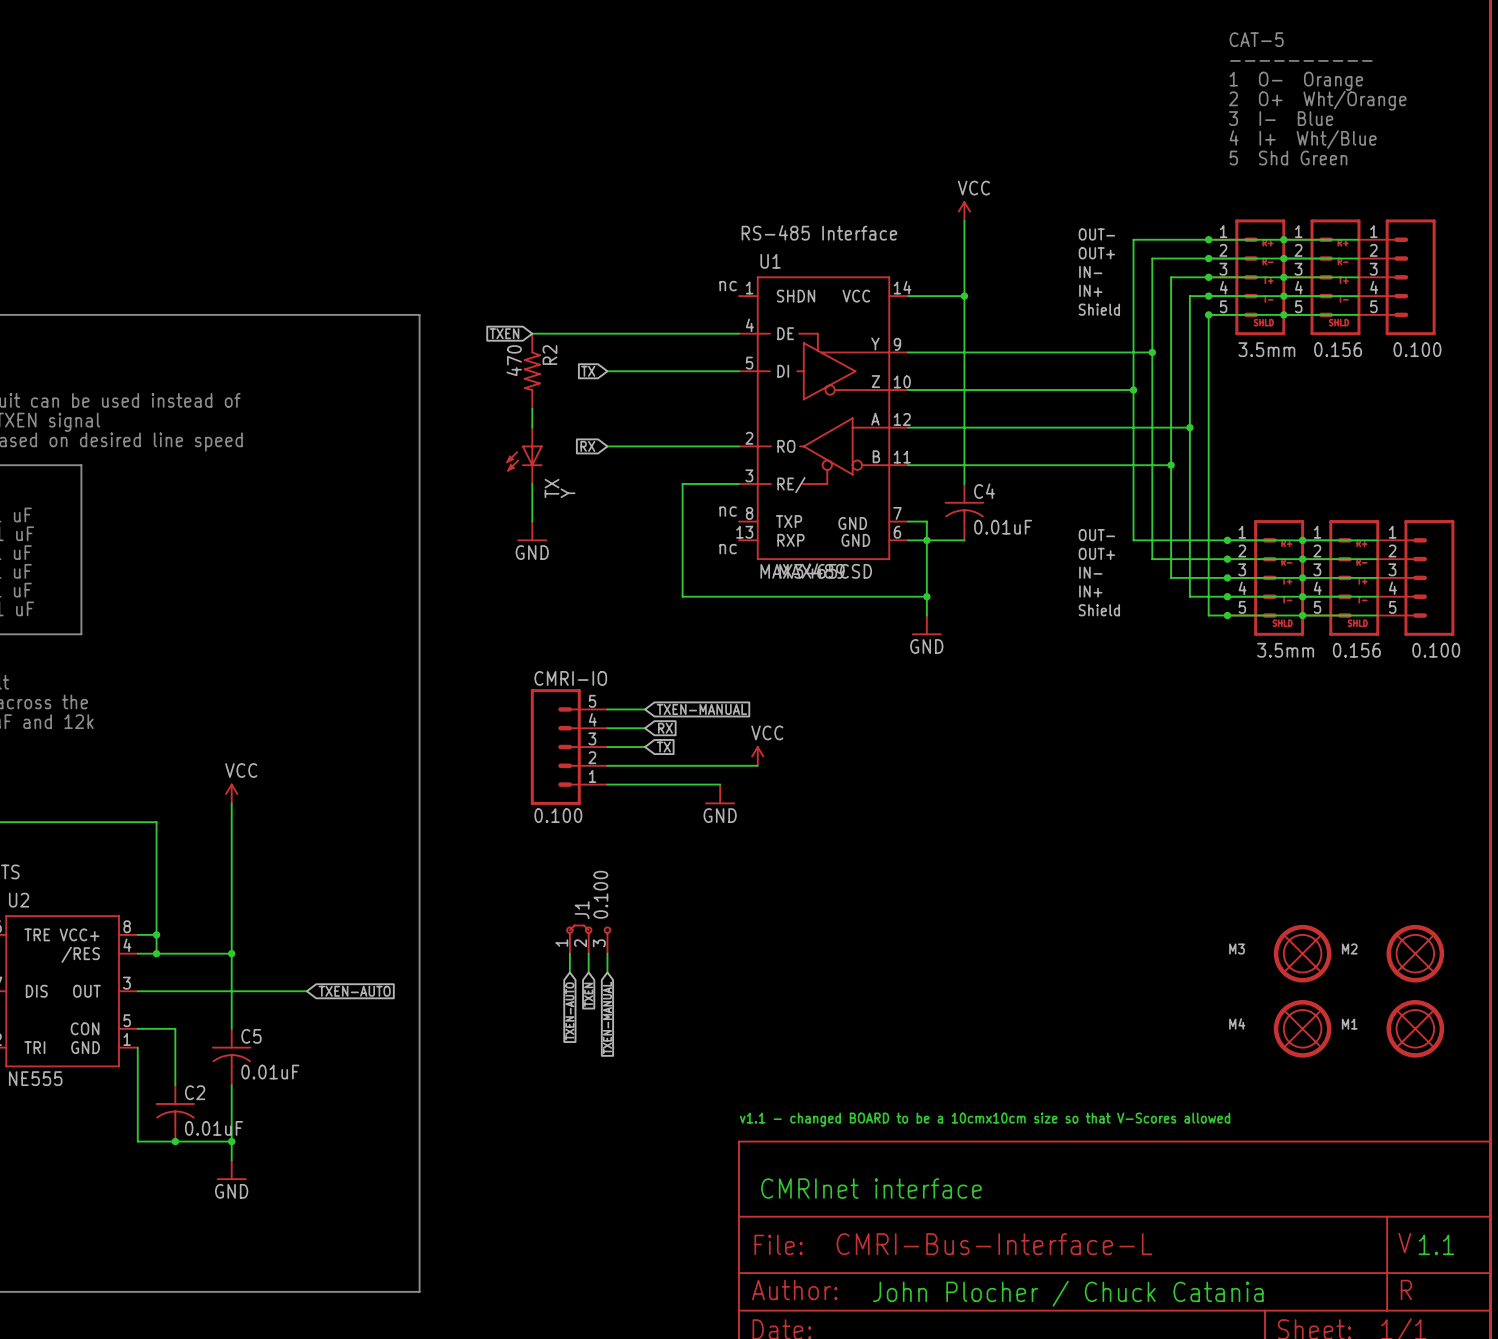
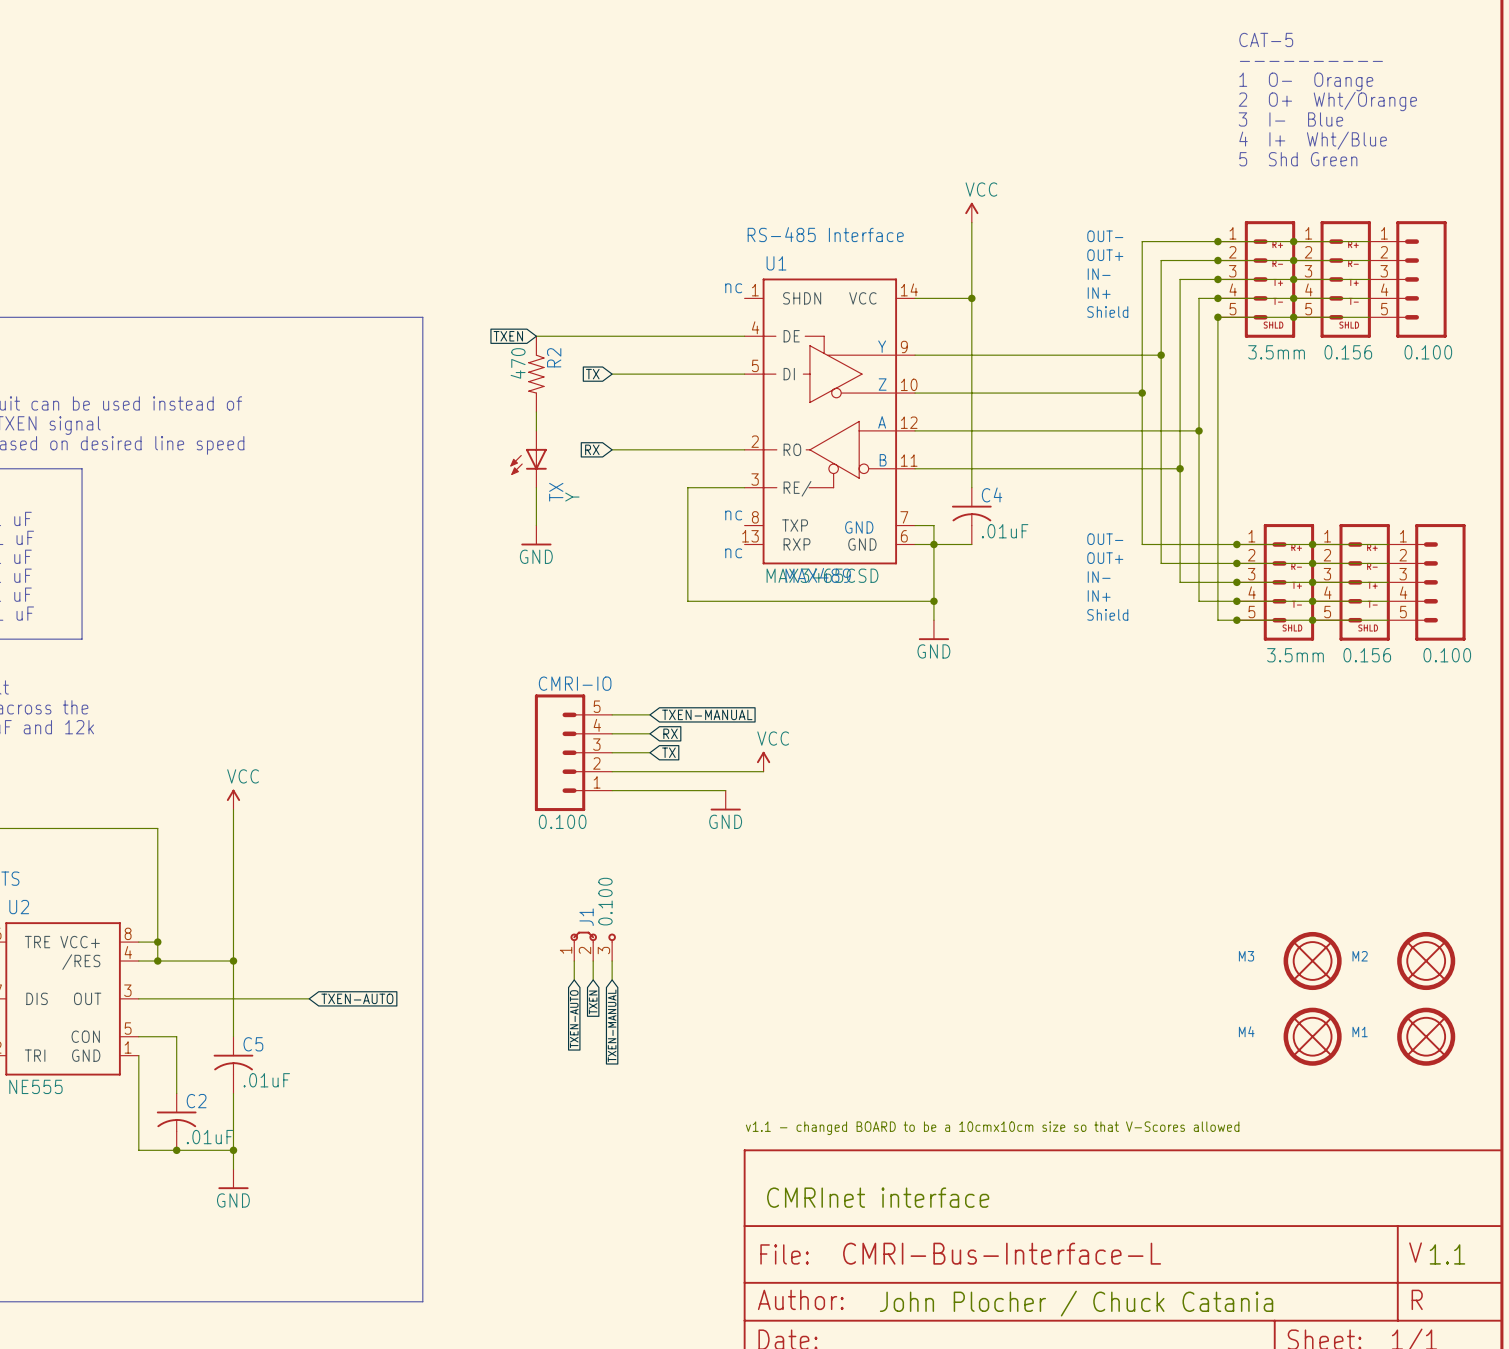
C4 value: 0.01uF (1003, 527) -> .01uF (1005, 531)
C5 value: 0.01uF (270, 1072) -> .01uF (266, 1080)
C2 value: 0.01uF (213, 1128) -> .01uF (209, 1137)

